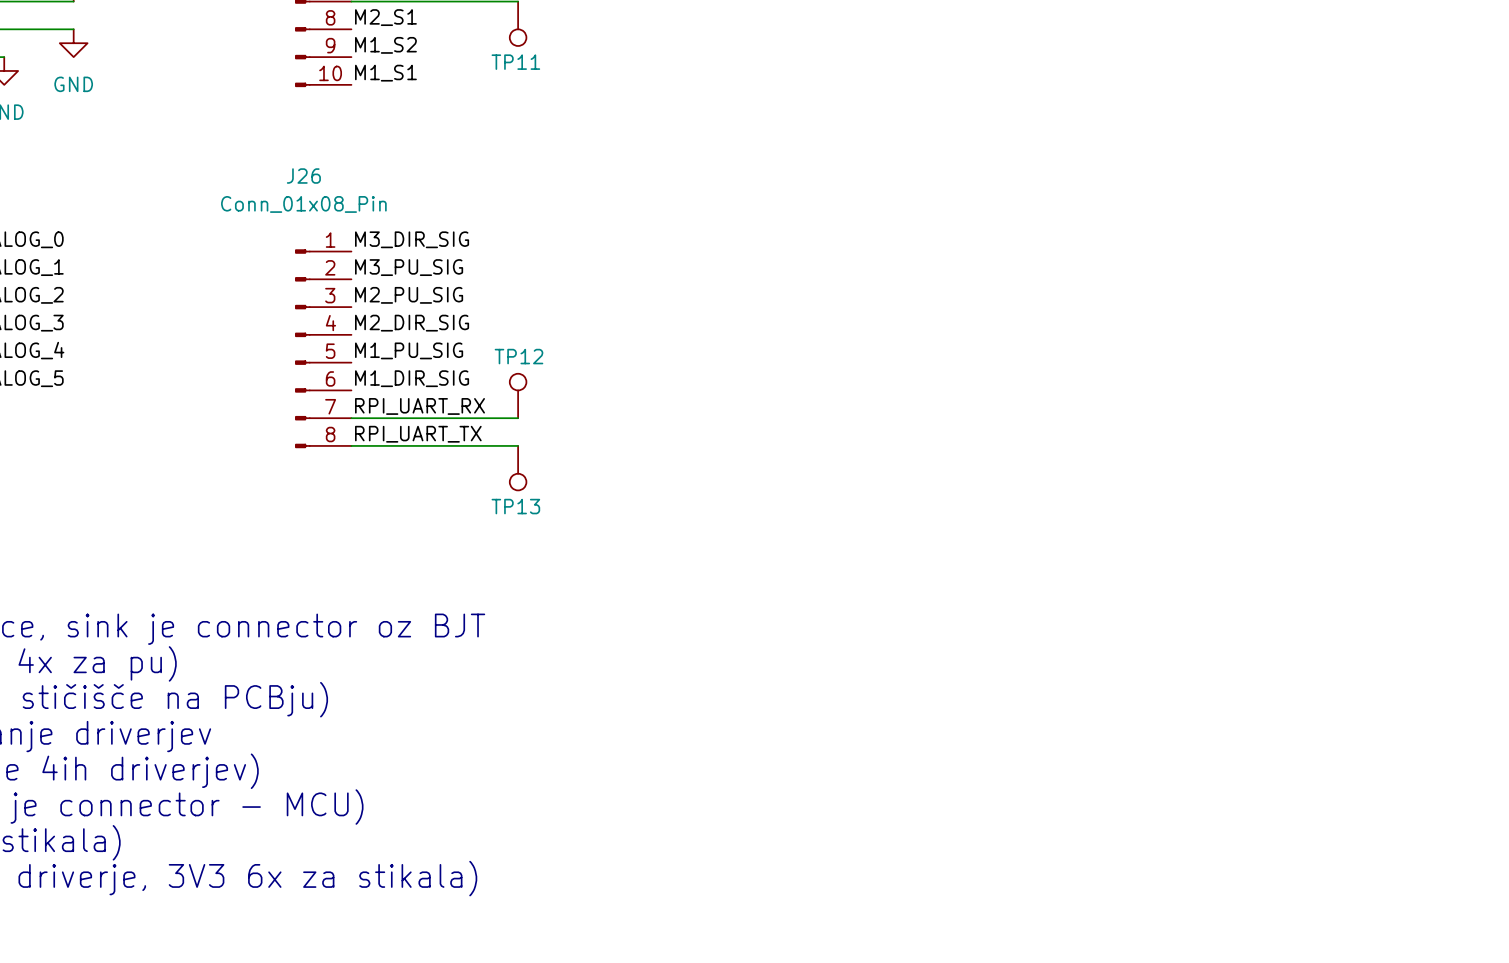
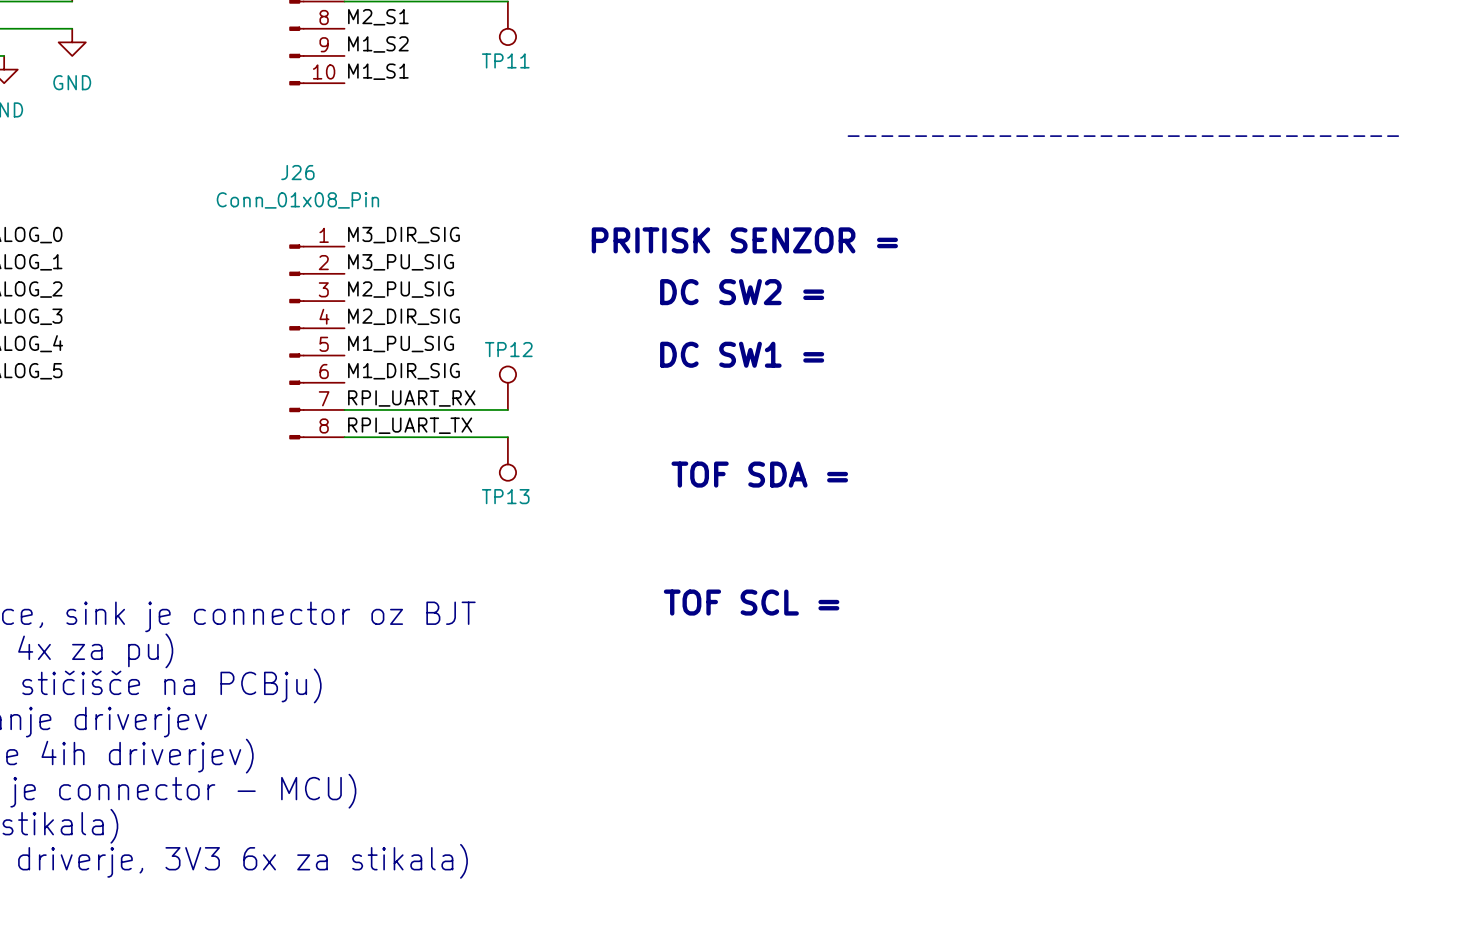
text: none -> --------------------------------- (1123, 136)
text: none -> PRITISK SENZOR = (744, 240)
text: none -> DC SW2 = (742, 292)
text: none -> DC SW1 = (742, 354)
text: none -> TOF SDA = (759, 474)
text: none -> TOF SCL = (751, 602)

